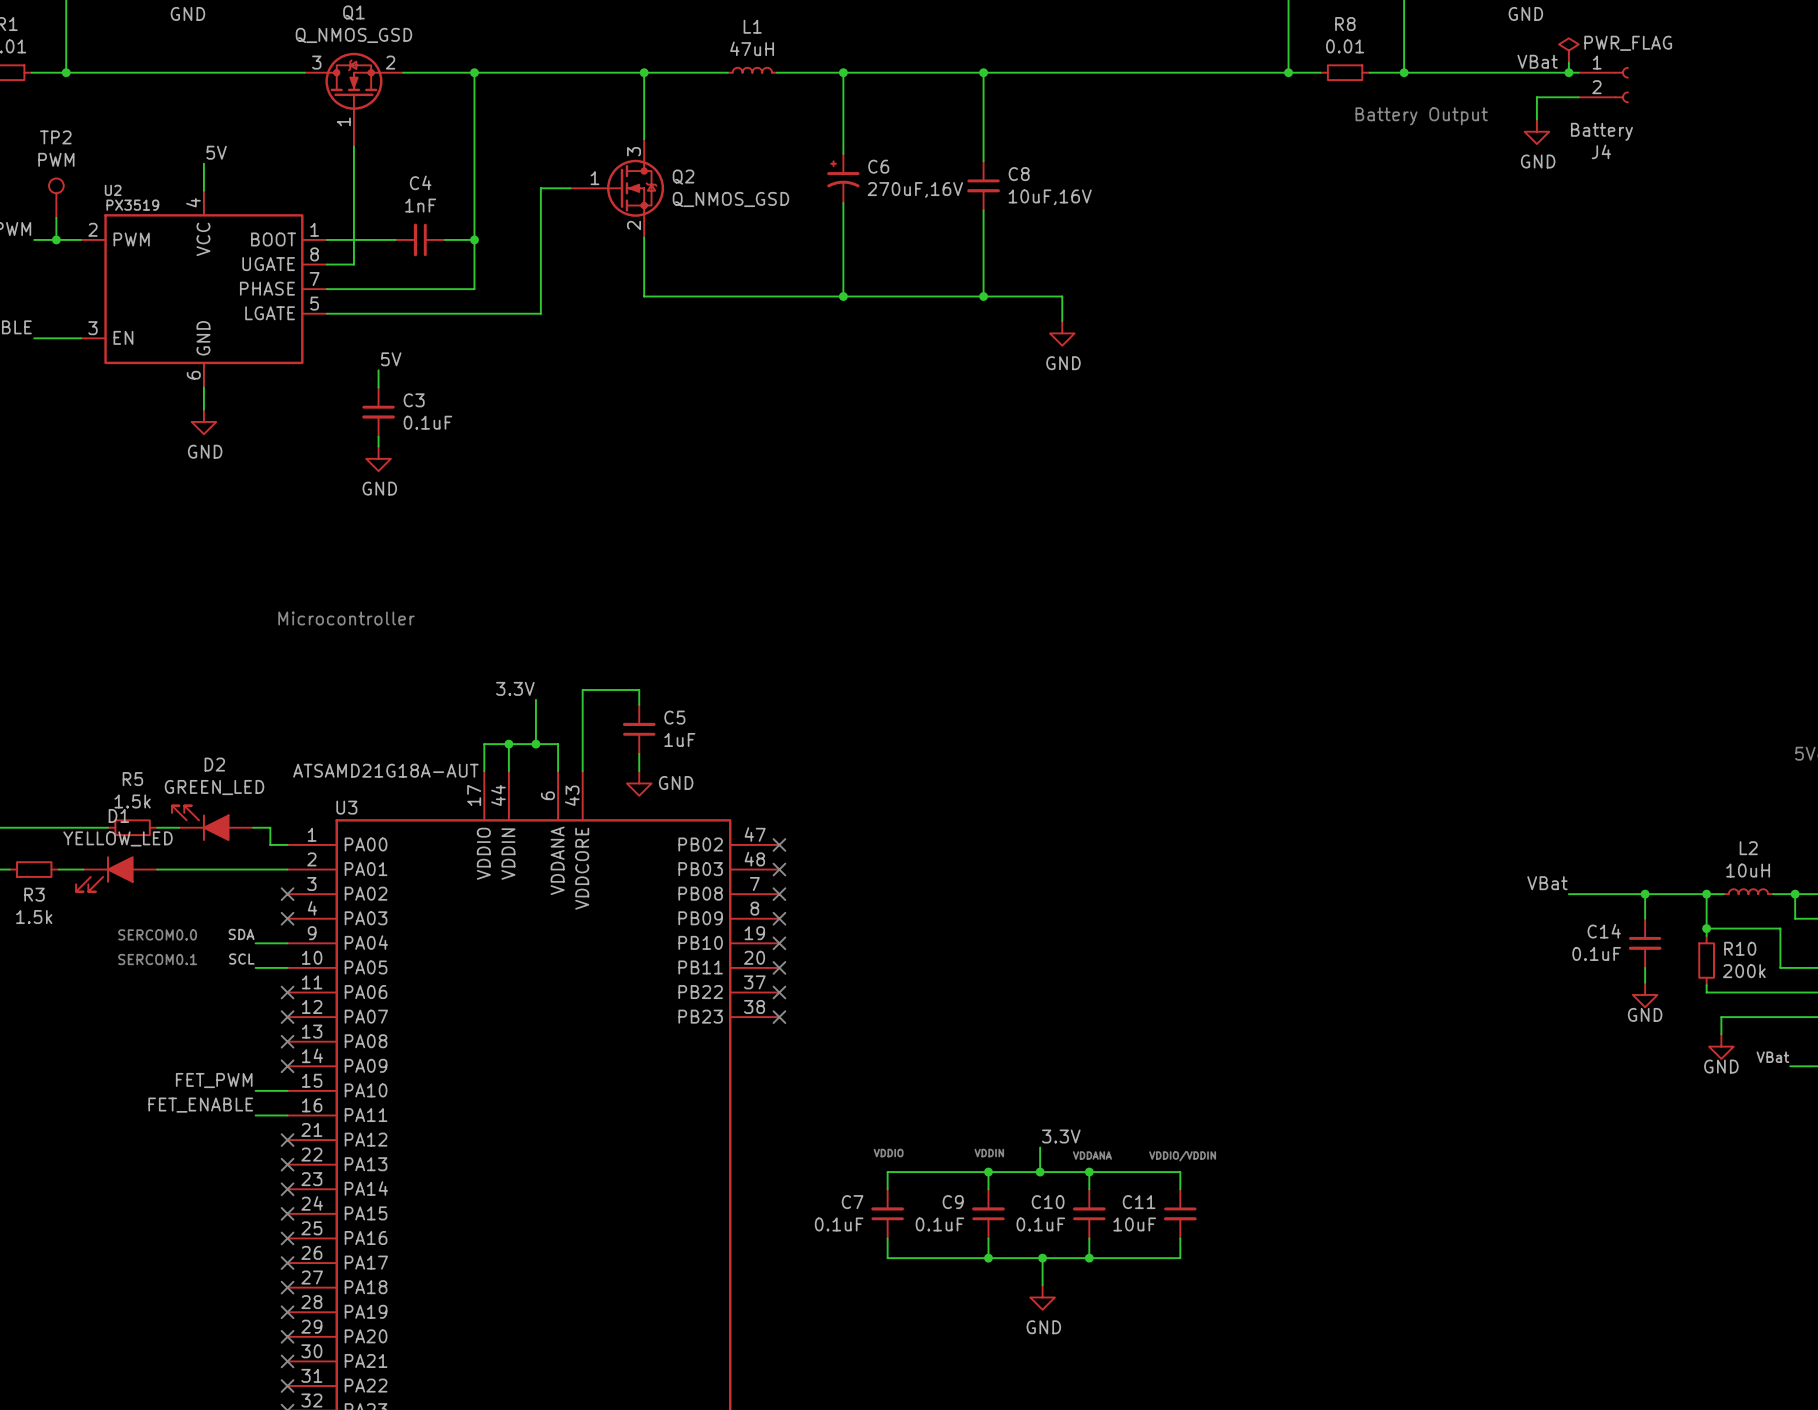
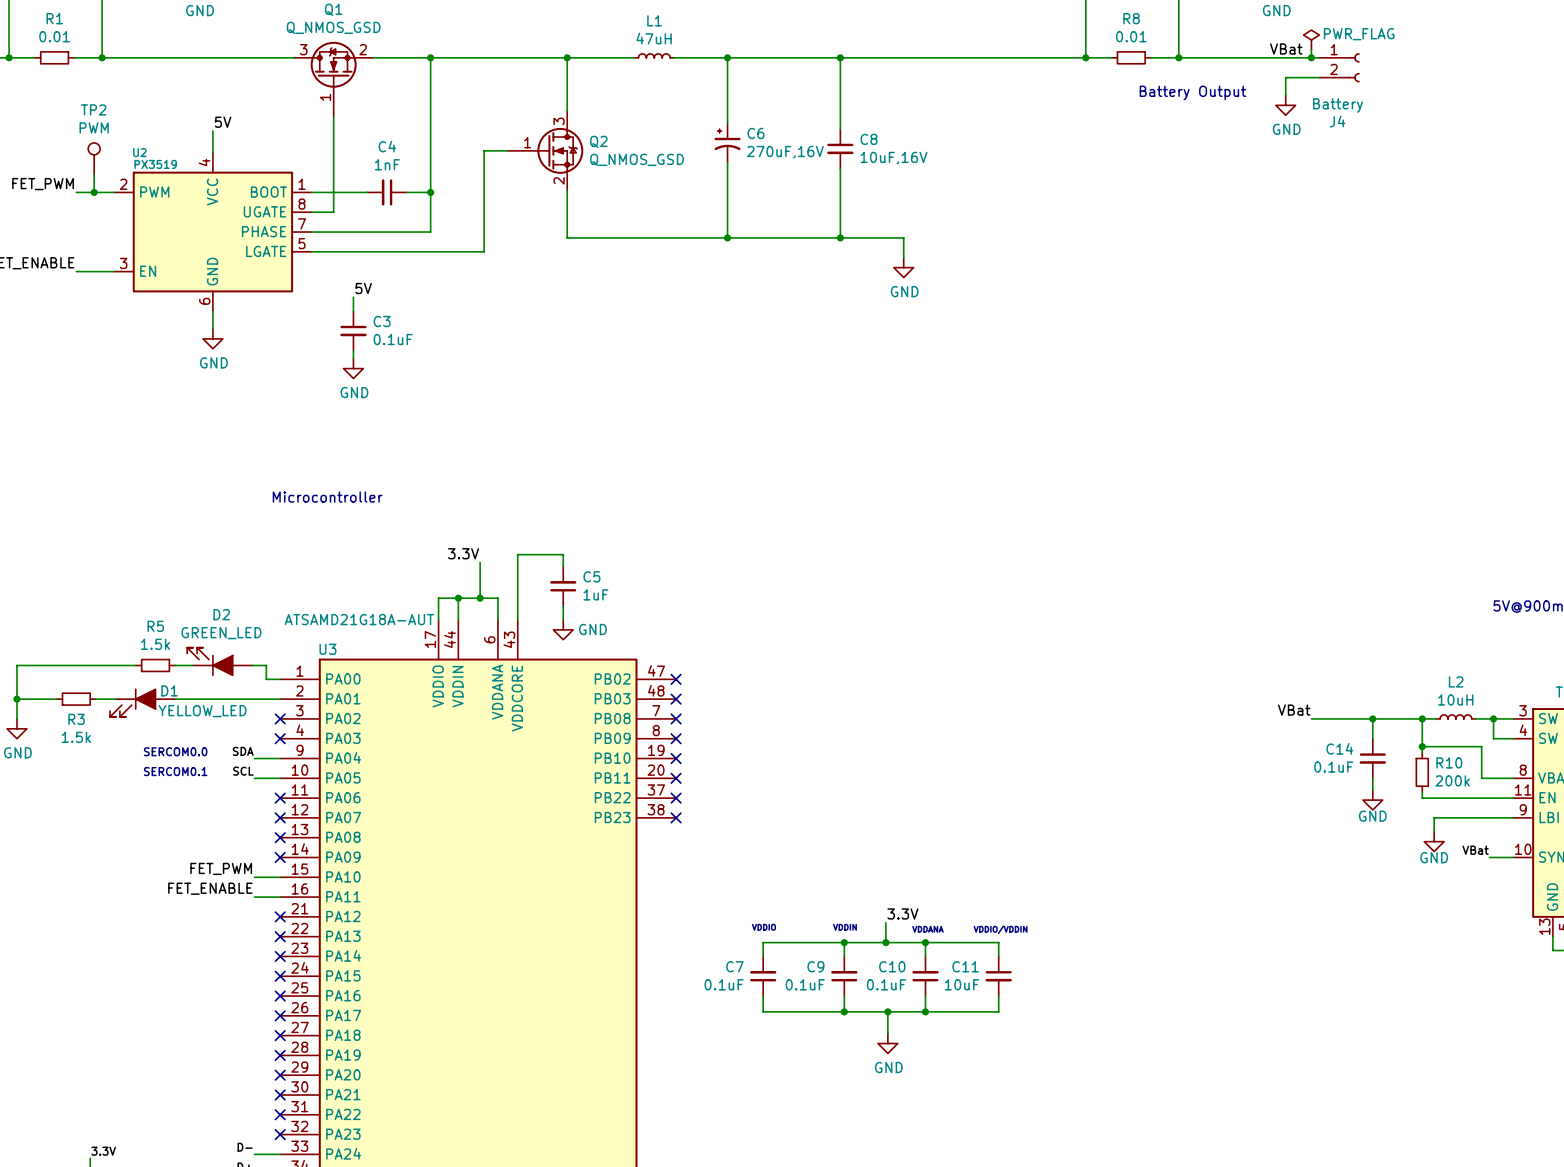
D1 name position: D1 (118, 815) -> D1 (169, 690)
D1 value position: YELLOW_LED (118, 838) -> YELLOW_LED (202, 711)

